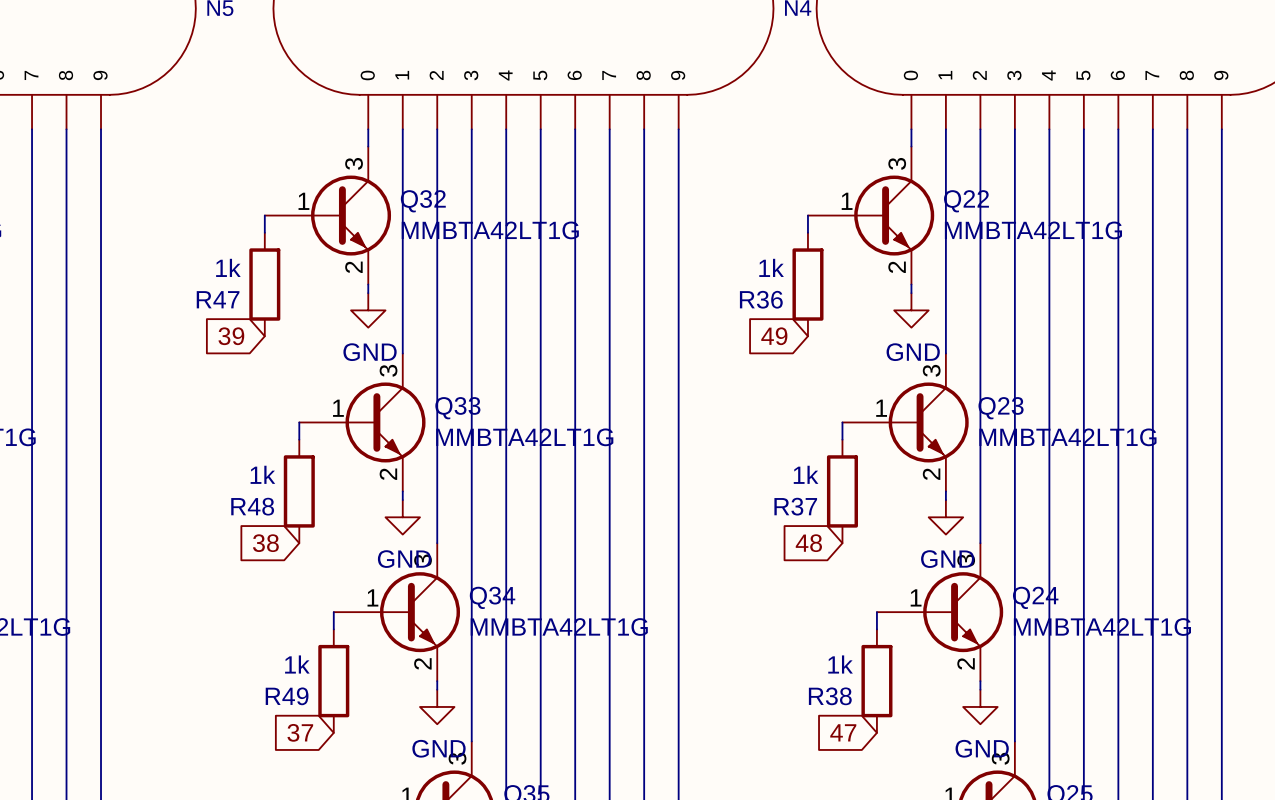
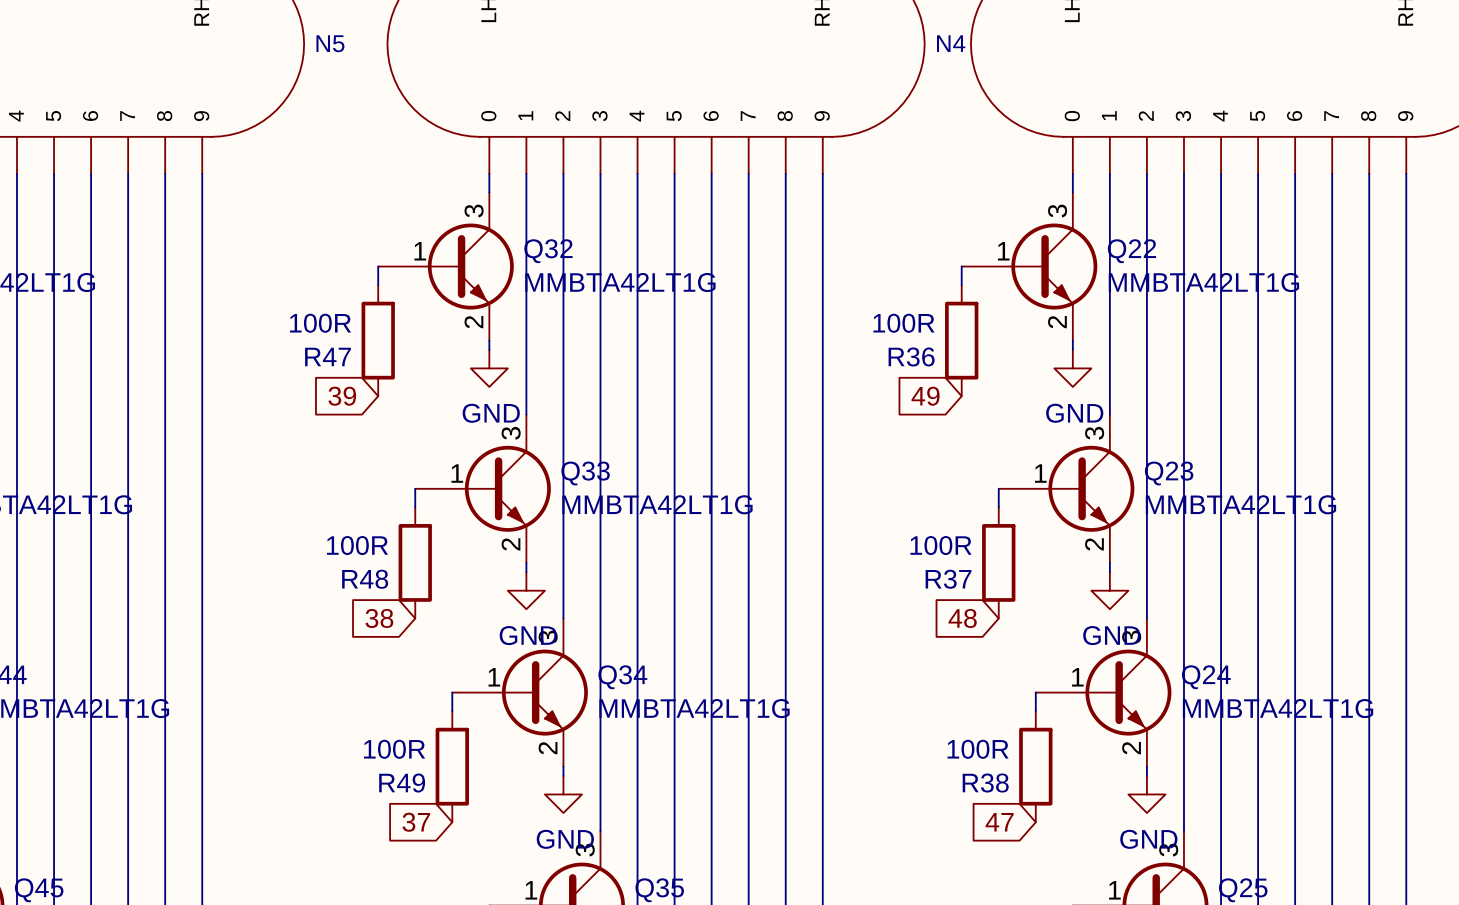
R47 value: 1k (228, 267) -> 100R (320, 323)
R36 value: 1k (771, 267) -> 100R (903, 323)
R48 value: 1k (262, 474) -> 100R (357, 545)
R37 value: 1k (806, 474) -> 100R (941, 545)
R49 value: 1k (297, 664) -> 100R (394, 749)
R38 value: 1k (840, 664) -> 100R (978, 749)

